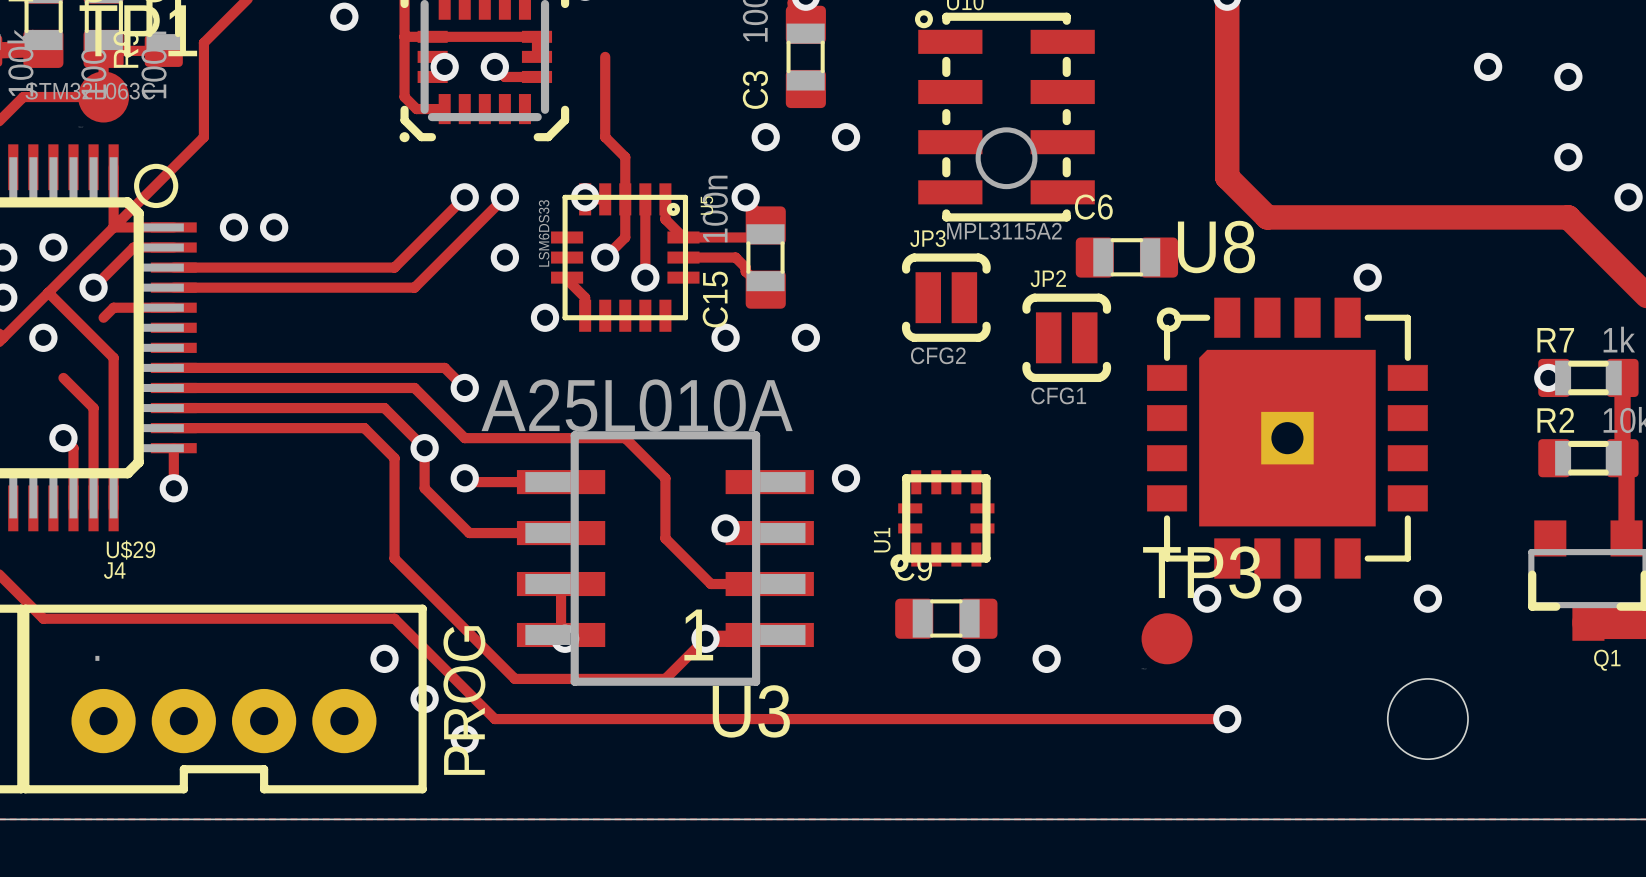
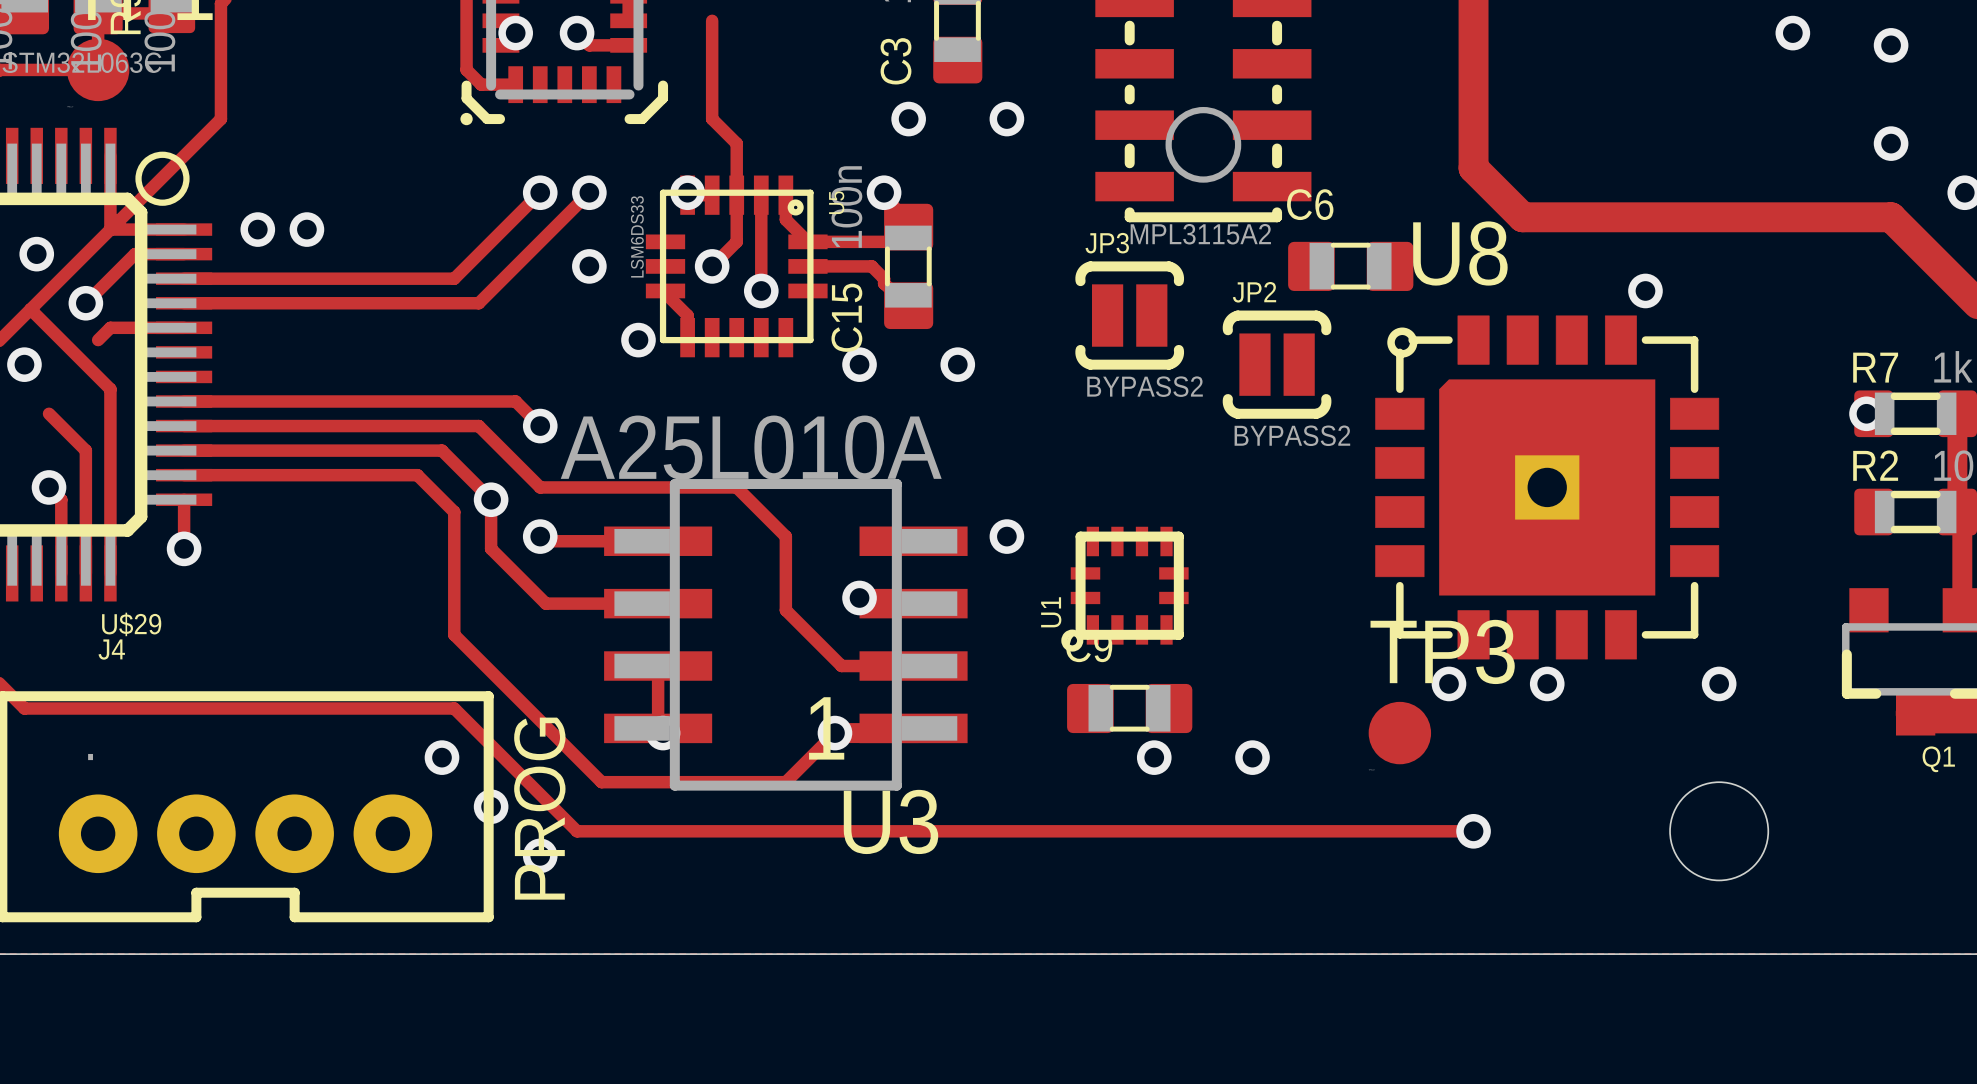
JP3 value: CFG2 (938, 355) -> BYPASS2 (1145, 386)
JP2 value: CFG1 (1058, 395) -> BYPASS2 (1292, 435)

